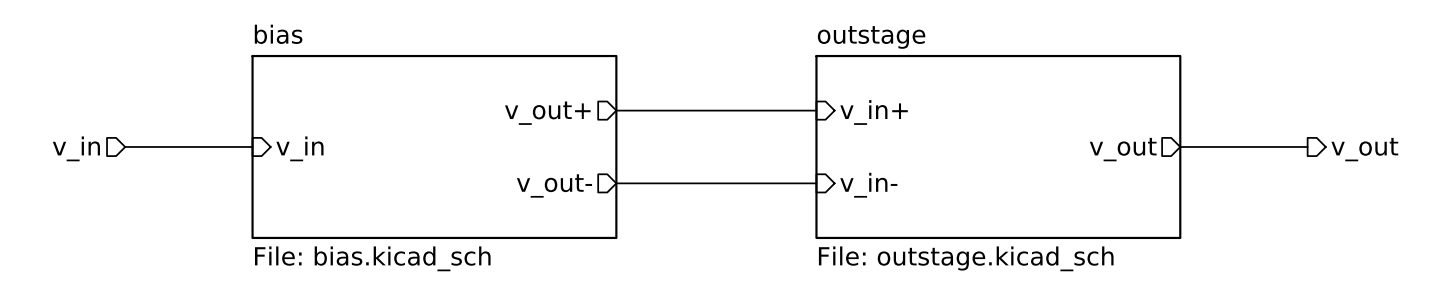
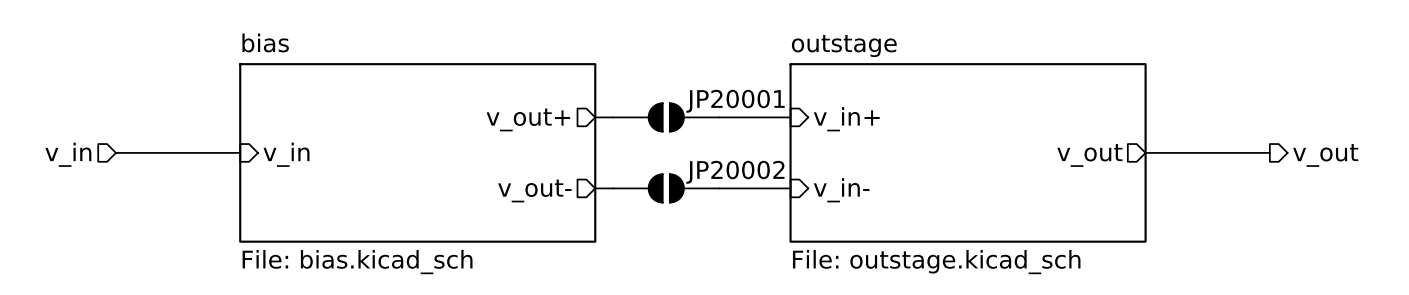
JP20001: none -> (666, 117)
JP20002: none -> (666, 188)

